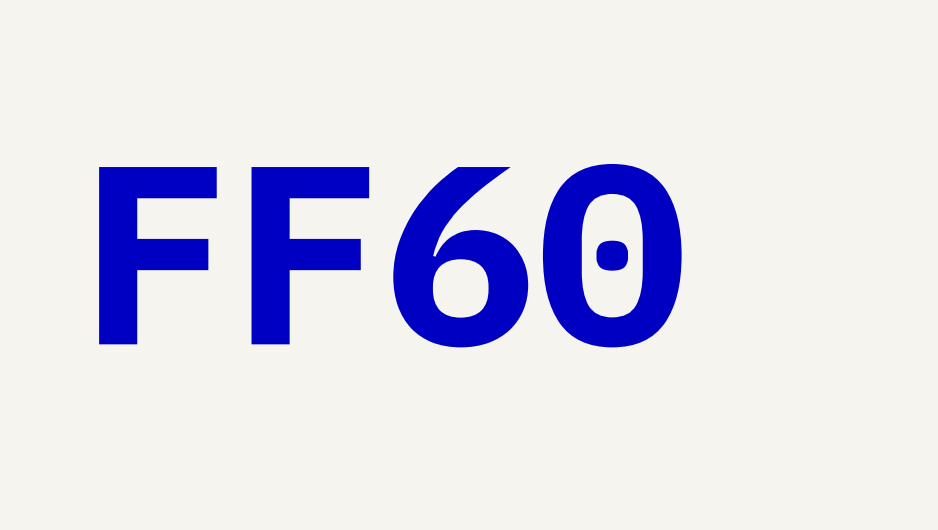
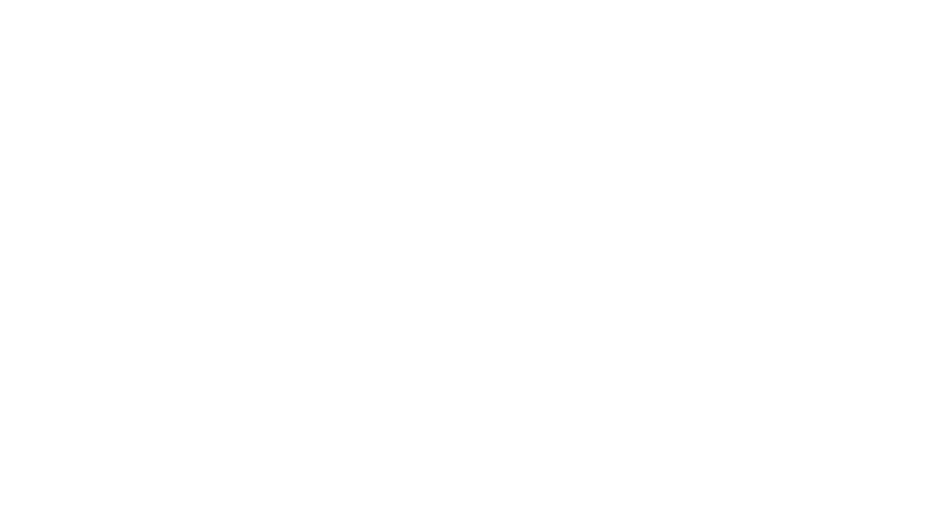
text: FF60 (390, 255) -> none

